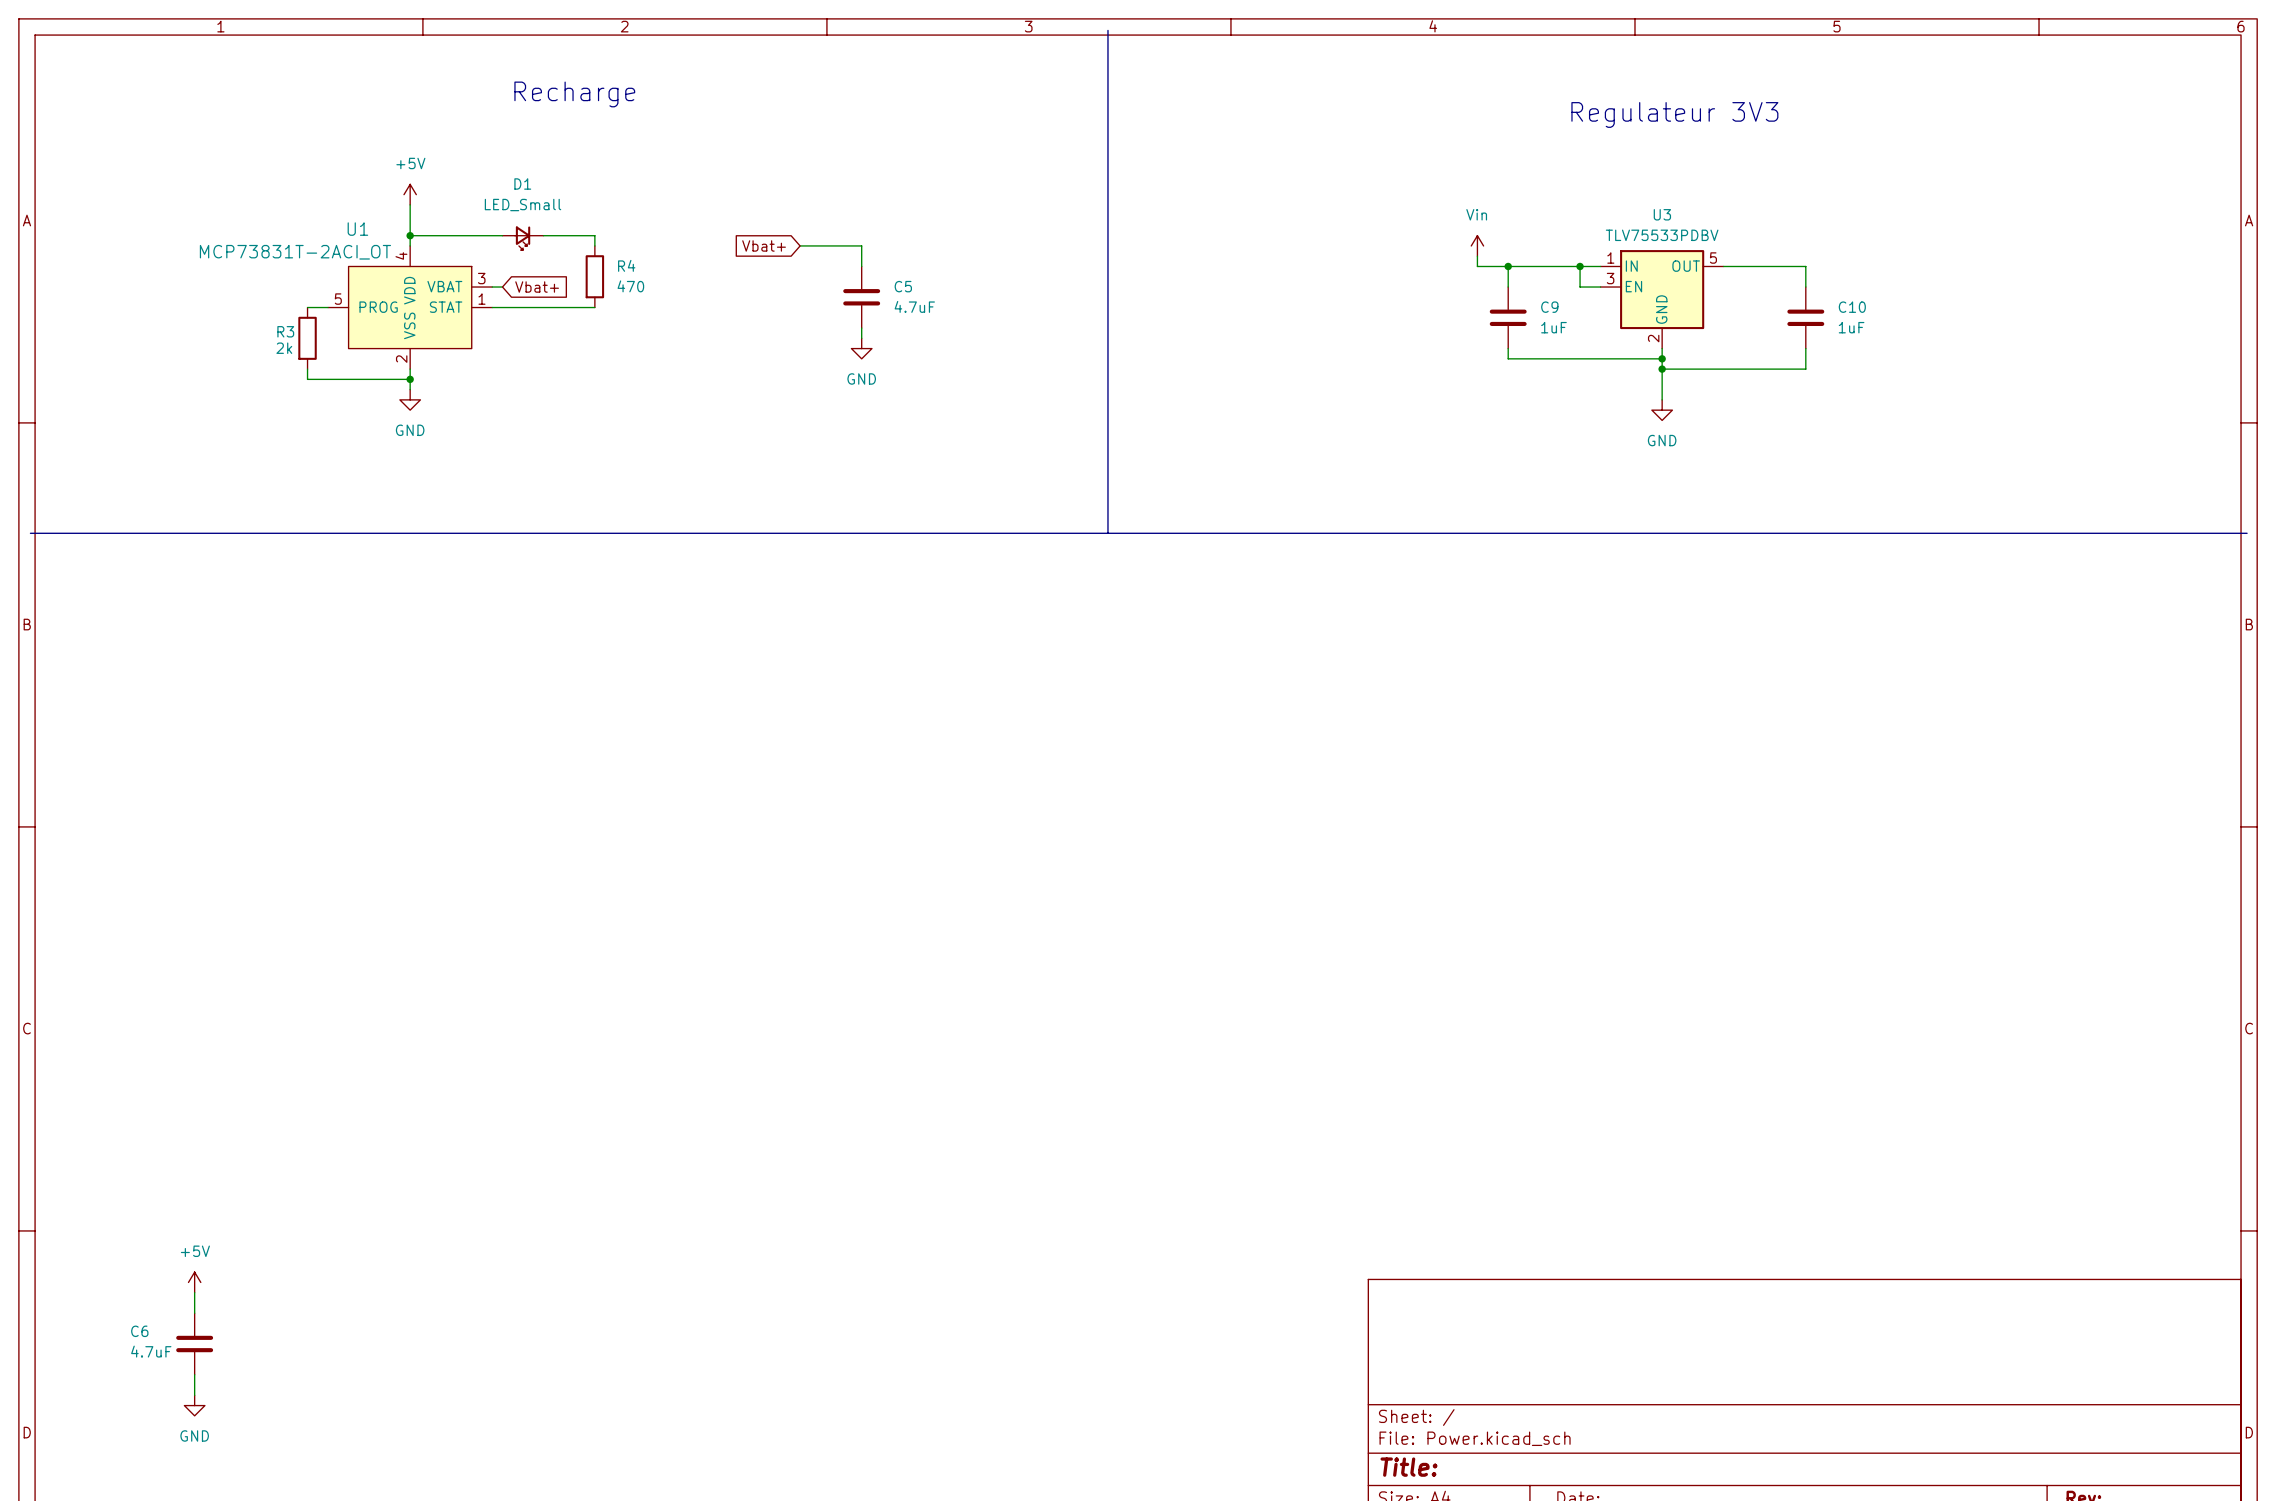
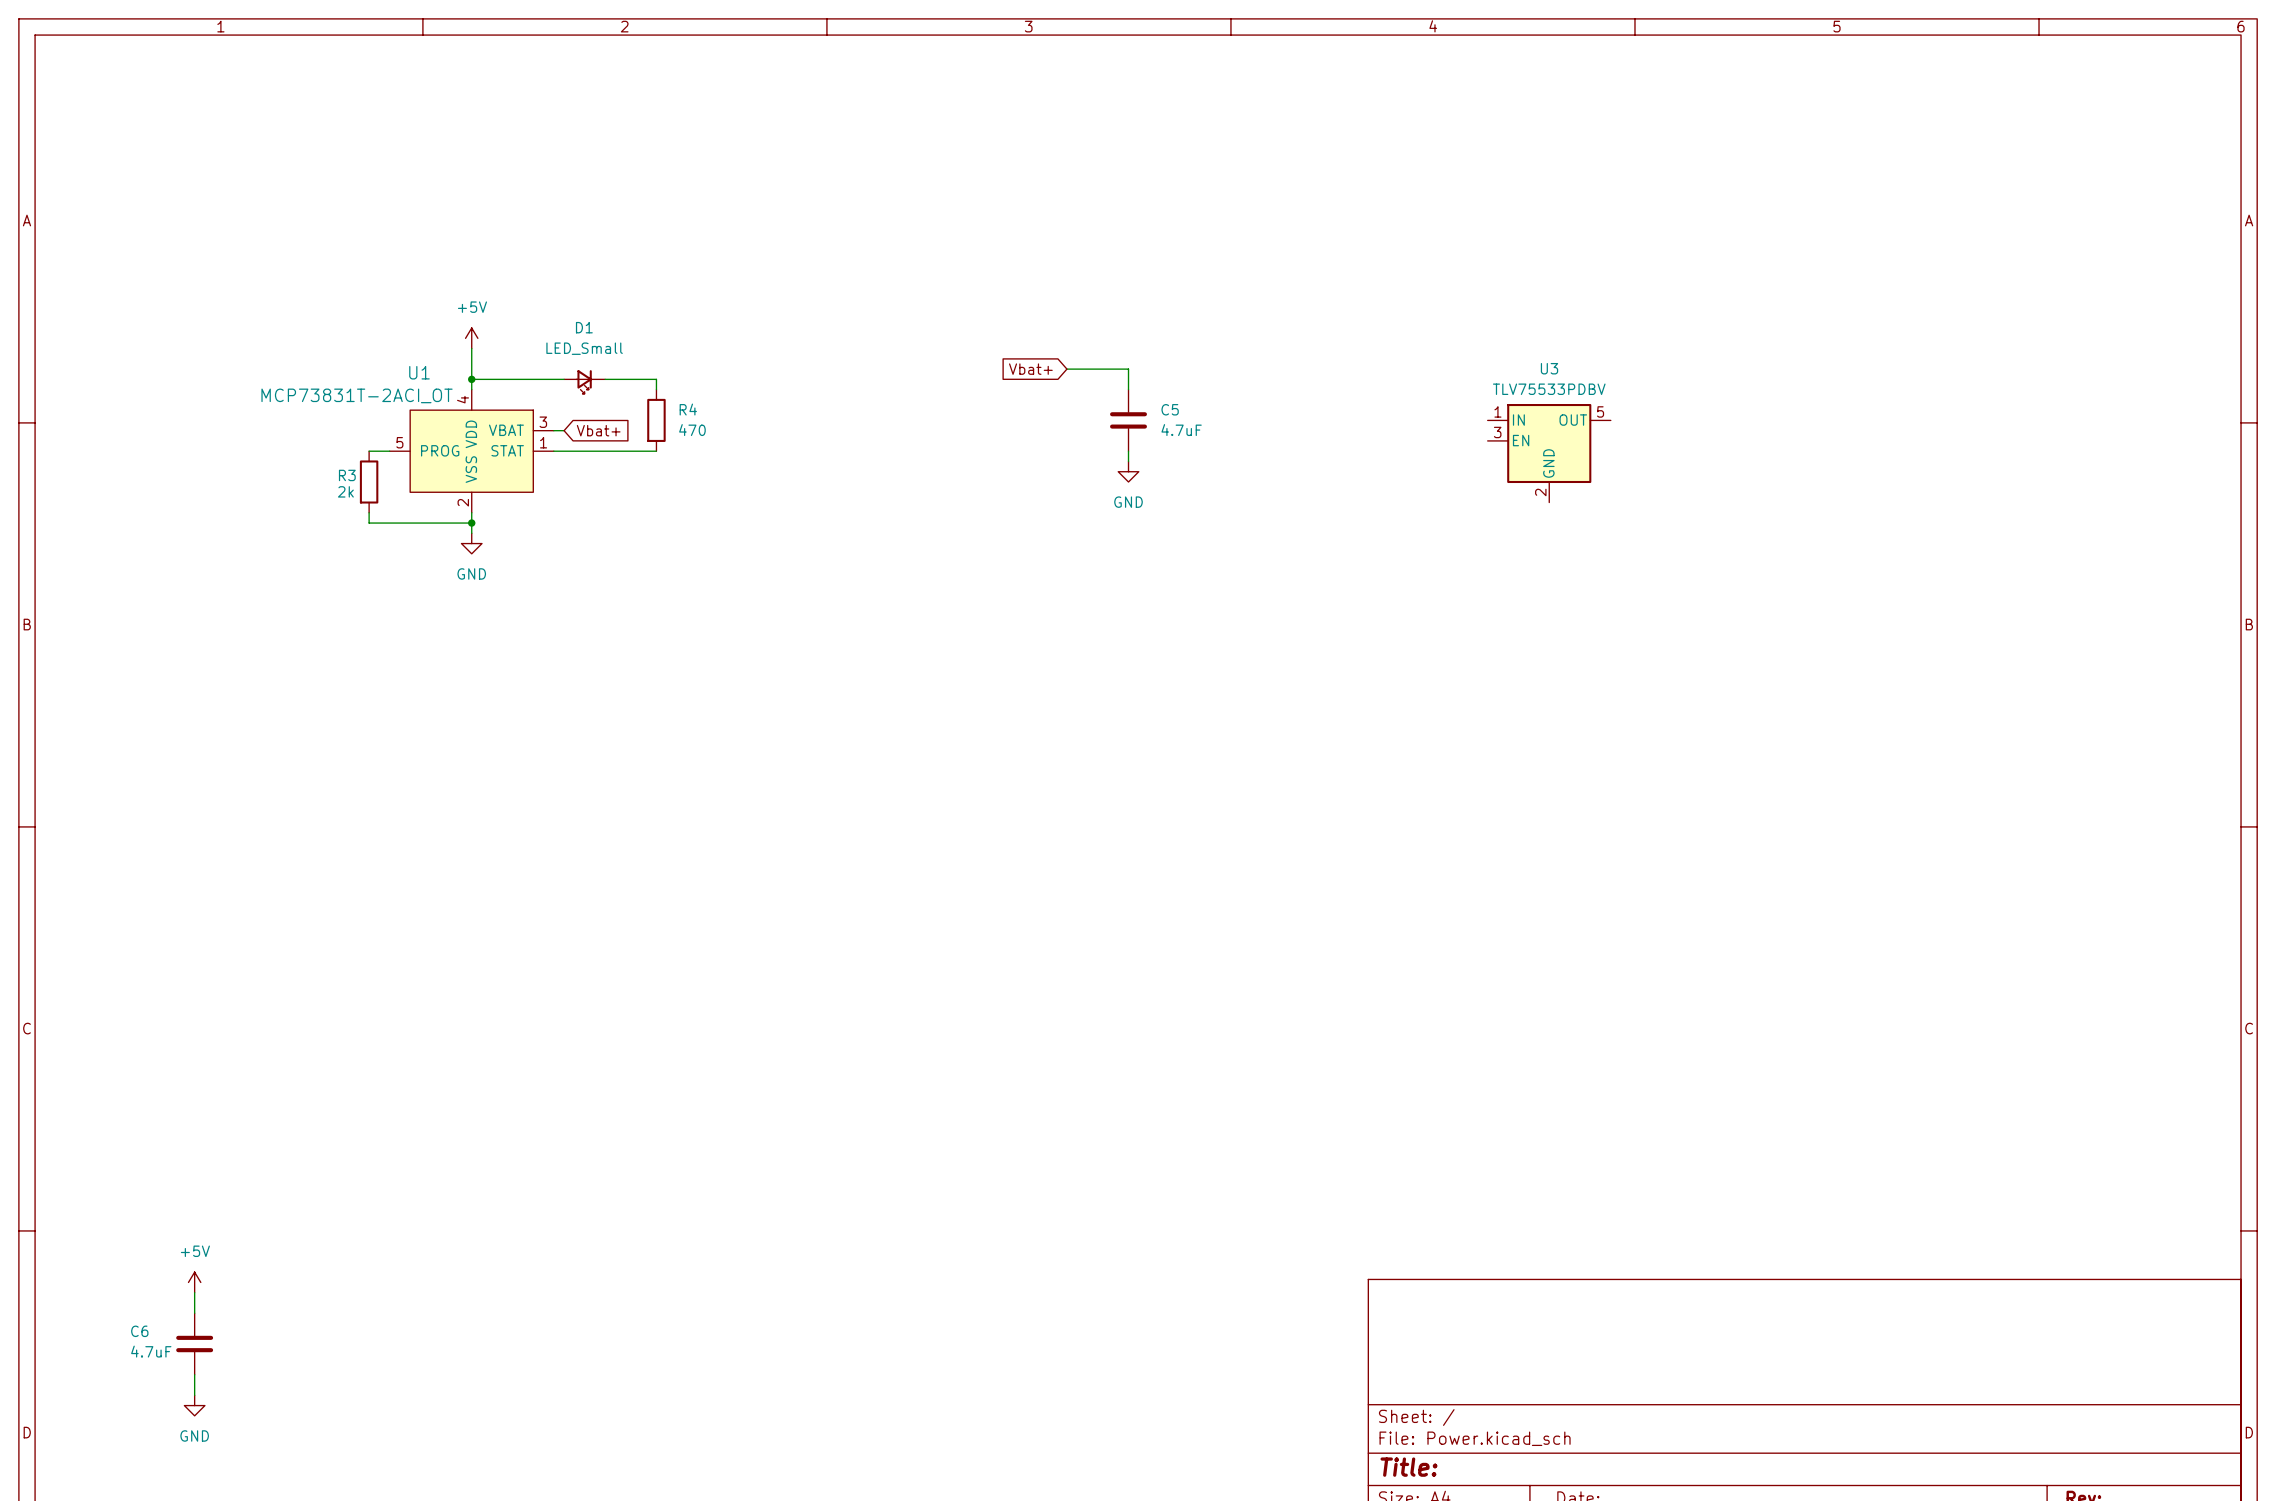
line: (1107, 30) (1107, 533) -> none
text: Recharge (574, 94) -> none
text: Regulateur 3V3 (1674, 114) -> none
power symbol position: +5V (410, 194) -> +5V (471, 338)
wire: (410, 204) (410, 245) -> (471, 348) (471, 389)
wire: (410, 235) (502, 235) -> (471, 379) (564, 379)
junction: (410, 235) -> none
wire: (543, 235) (594, 235) (594, 245) -> (605, 379) (656, 379) (656, 389)
D1 position: (523, 238) -> (584, 381)
global label: Vbat+ (764, 245) -> none
wire: (800, 245) (861, 245) (861, 266) -> none
power symbol: Vin (1477, 245) -> none
wire: (1477, 256) (1477, 266) (1600, 266) -> none
wire: (1508, 266) (1508, 287) -> none
junction: (1508, 266) -> none
wire: (1580, 266) (1580, 287) (1600, 287) -> none
junction: (1580, 266) -> none
wire: (1723, 266) (1805, 266) (1805, 287) -> none
R4 position: (594, 276) -> (656, 420)
wire: (492, 287) (502, 287) -> (553, 430) (564, 430)
global label: Vbat+ (537, 287) -> none
C5 position: (861, 297) -> (1128, 420)
U3 position: (1662, 299) -> (1549, 453)
wire: (307, 307) (328, 307) -> (369, 451) (389, 451)
U1 position: (410, 307) -> (471, 451)
wire: (492, 307) (594, 307) -> (553, 451) (656, 451)
C9: 1uF (1508, 317) -> none
C10: 1uF (1805, 317) -> none
wire: (861, 328) (861, 338) -> none
R3 position: (307, 338) -> (369, 481)
power symbol: GND (861, 348) -> none
wire: (1508, 348) (1508, 358) (1662, 358) -> none
wire: (1662, 348) (1662, 399) -> none
wire: (1805, 348) (1805, 369) (1662, 369) -> none
junction: (1662, 358) -> none
wire: (307, 369) (307, 379) (410, 379) -> (369, 512) (369, 523) (471, 523)
wire: (410, 369) (410, 389) -> (471, 512) (471, 533)
global label: none -> Vbat+ (1030, 369)
wire: none -> (1066, 369) (1128, 369) (1128, 389)
junction: (1662, 369) -> none
junction: (410, 379) -> none
junction: none -> (471, 379)
power symbol position: GND (410, 399) -> GND (471, 543)
power symbol: GND (1662, 410) -> none
global label: none -> Vbat+ (598, 430)
wire: none -> (1128, 451) (1128, 461)
power symbol: none -> GND (1128, 471)
junction: none -> (471, 523)
line: (30, 533) (2247, 533) -> none

